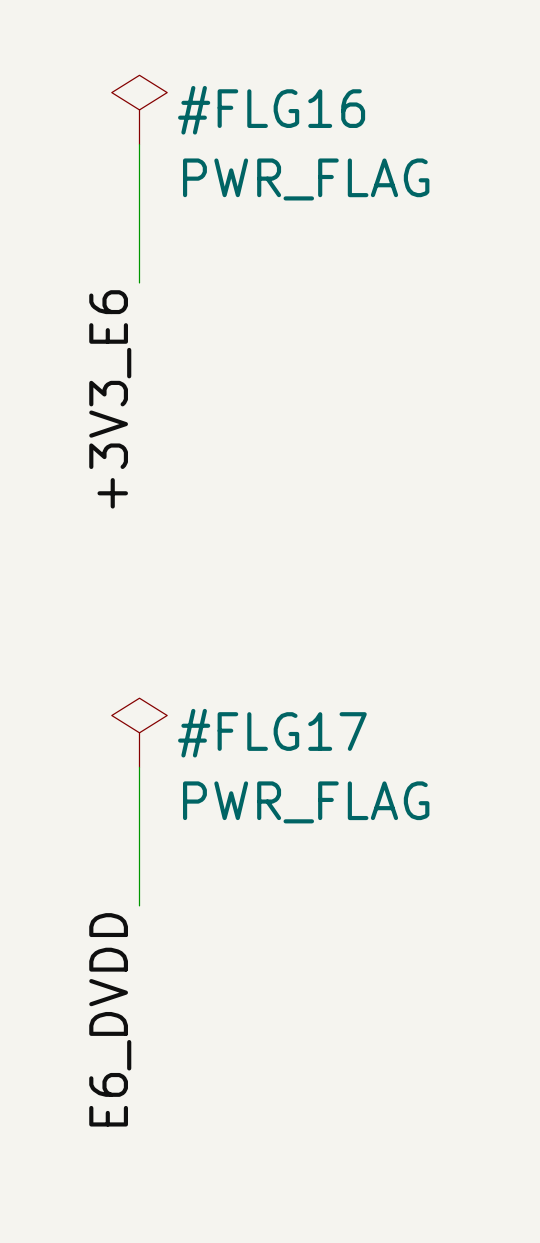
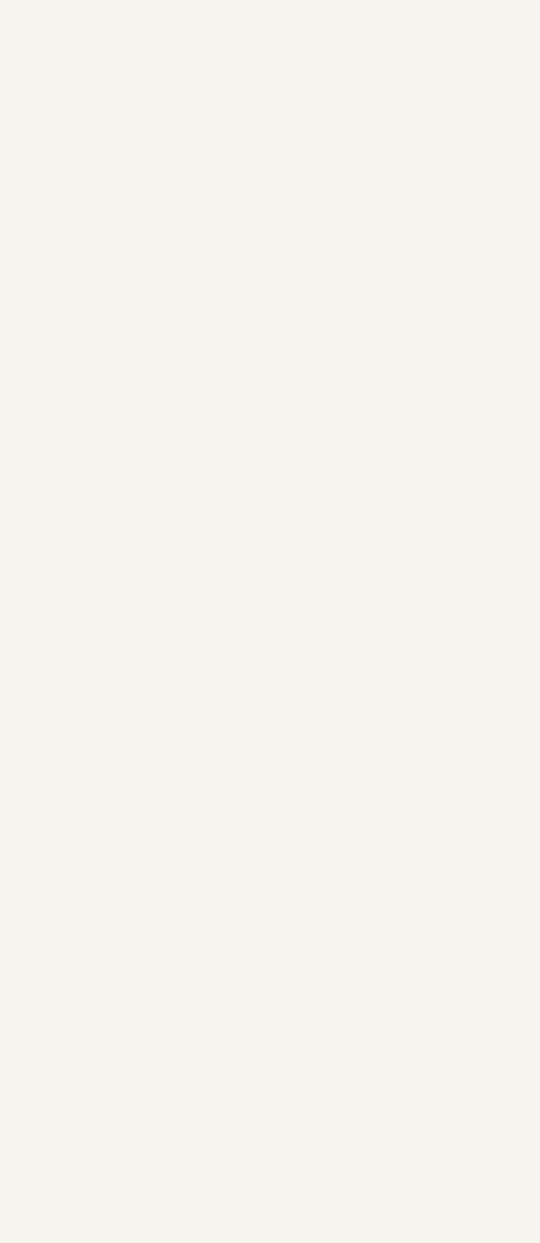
#FLG16: PWR_FLAG (139, 109) -> none
wire: (139, 144) (139, 282) -> none
label: +3V3_E6 (110, 399) -> none
#FLG17: PWR_FLAG (139, 732) -> none
wire: (139, 767) (139, 905) -> none
label: E6_DVDD (110, 1019) -> none

